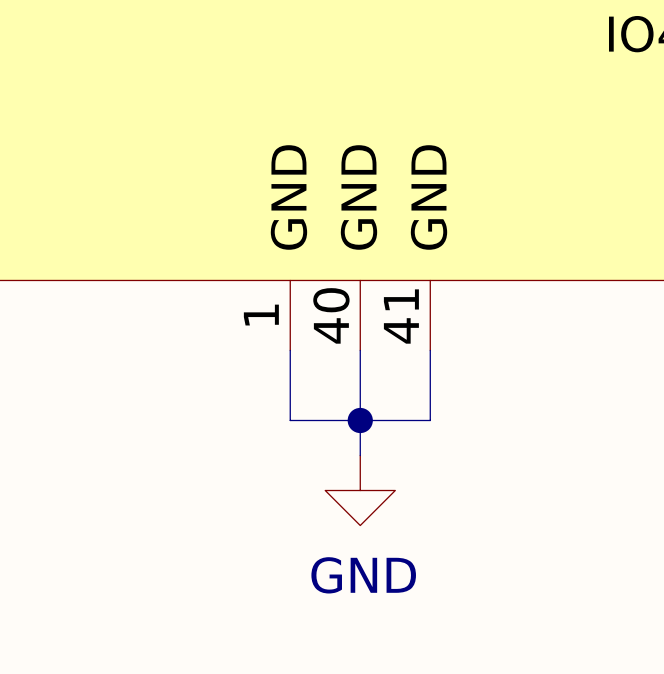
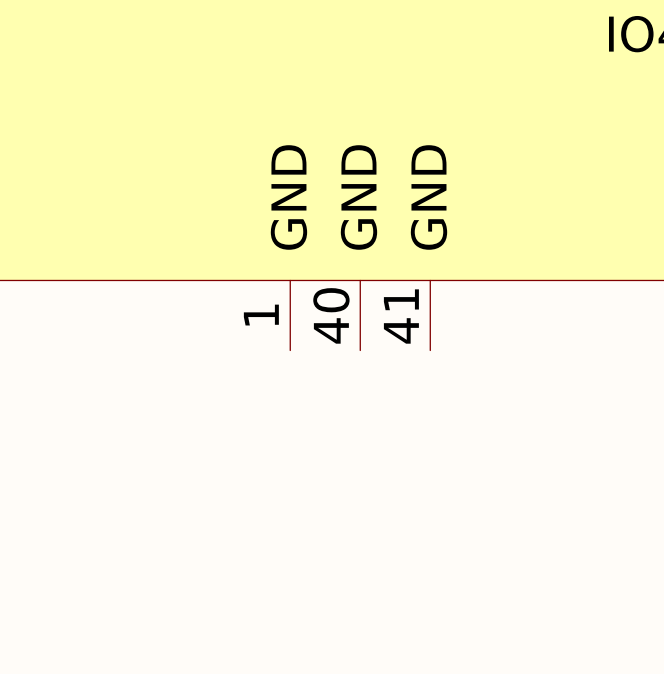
wire: (290, 350) (290, 420) (430, 420) (430, 350) -> none
wire: (360, 350) (360, 455) -> none
junction: (360, 420) -> none
power symbol: GND (360, 490) -> none

